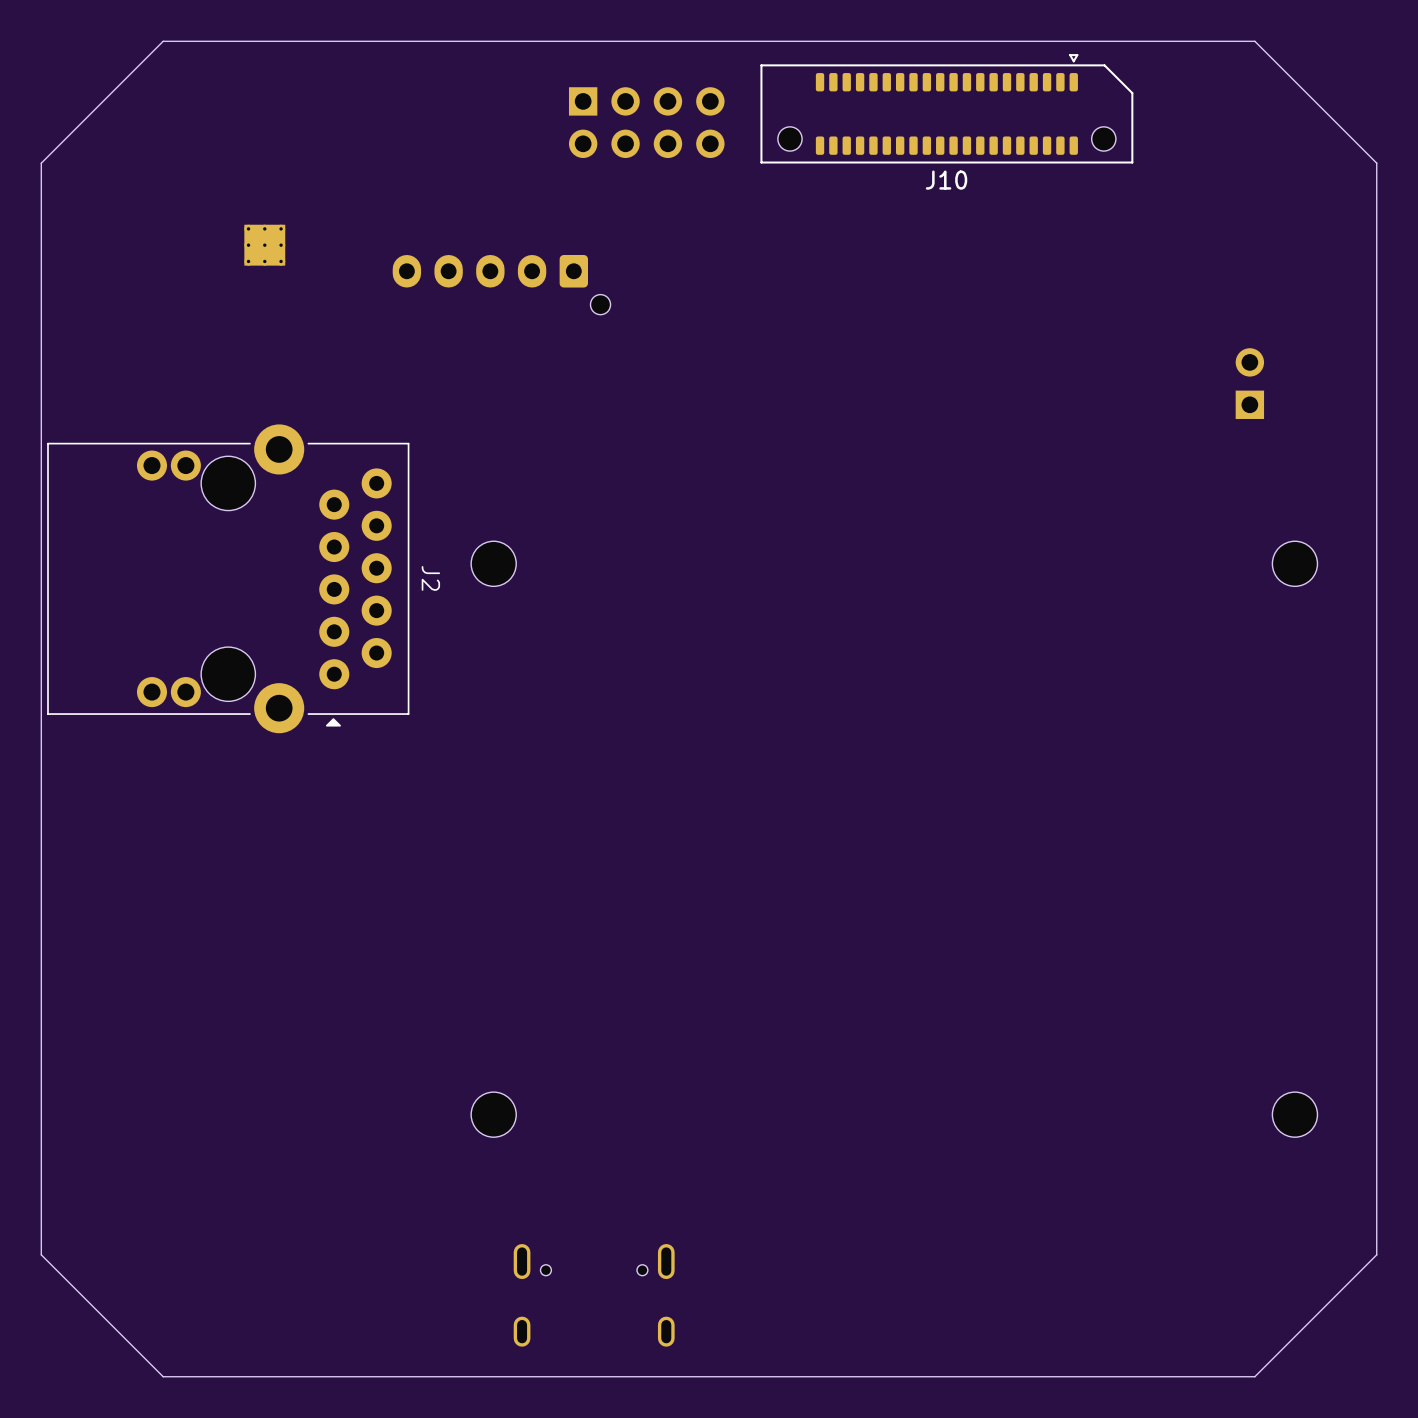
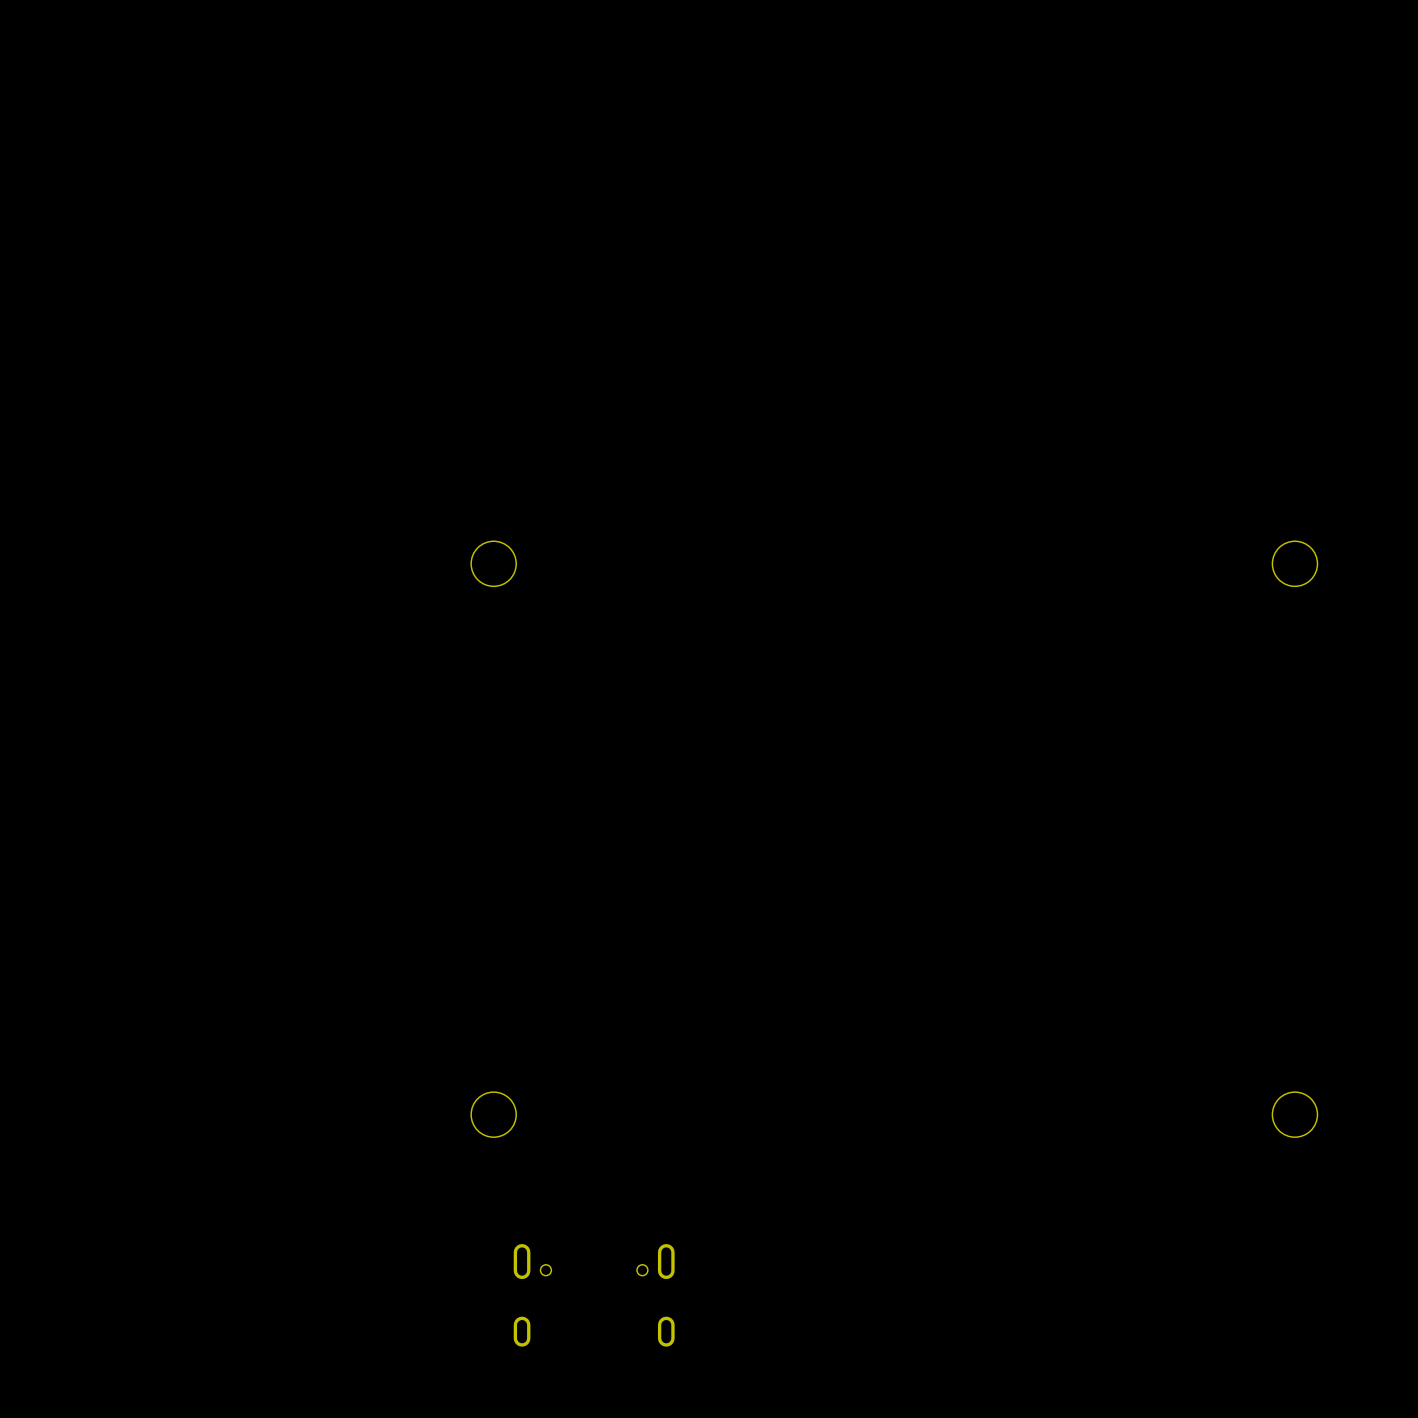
board edge: (1254, 41) (1376, 163) (1376, 1254) (1254, 1376) (163, 1376) (41, 1254) (41, 163) (163, 41) (1254, 41) -> none
J10: (946, 108) -> none
part: (646, 122) -> none
part: (264, 245) -> none
part: (501, 284) -> none
part: (1249, 383) -> none
J2: (228, 578) -> none

